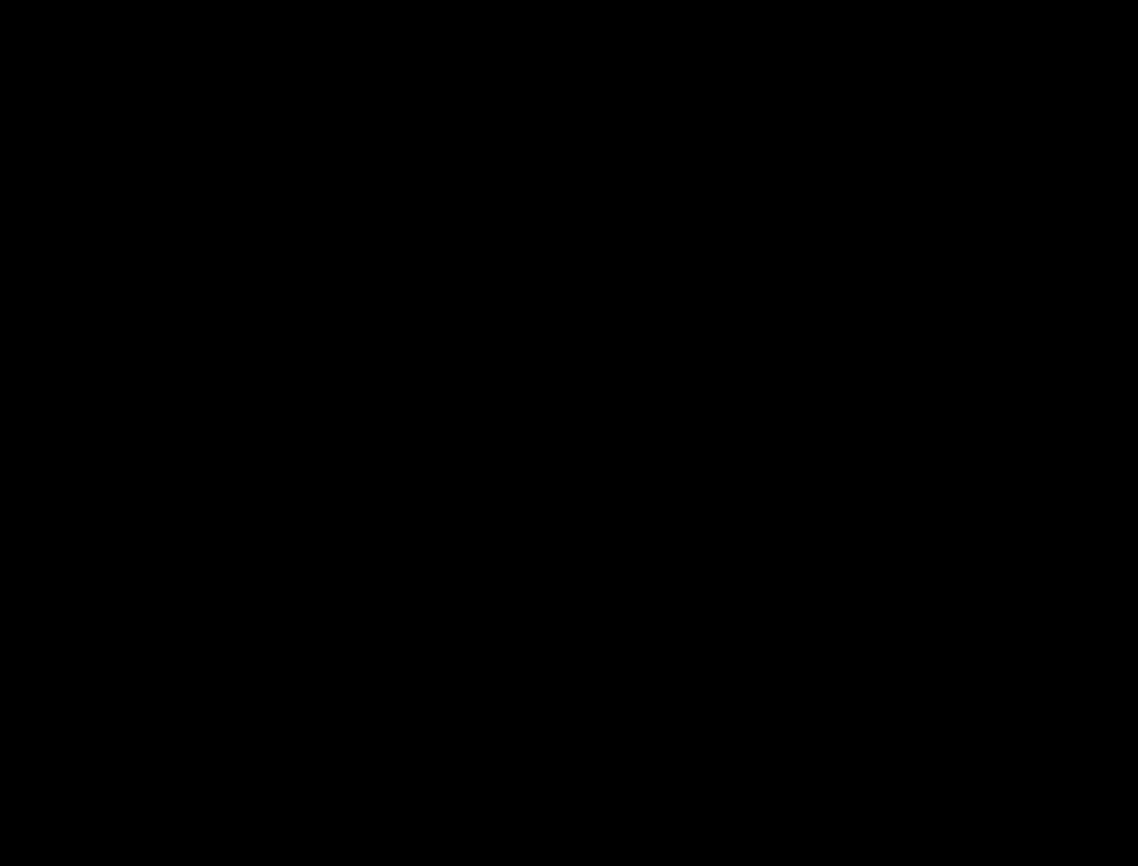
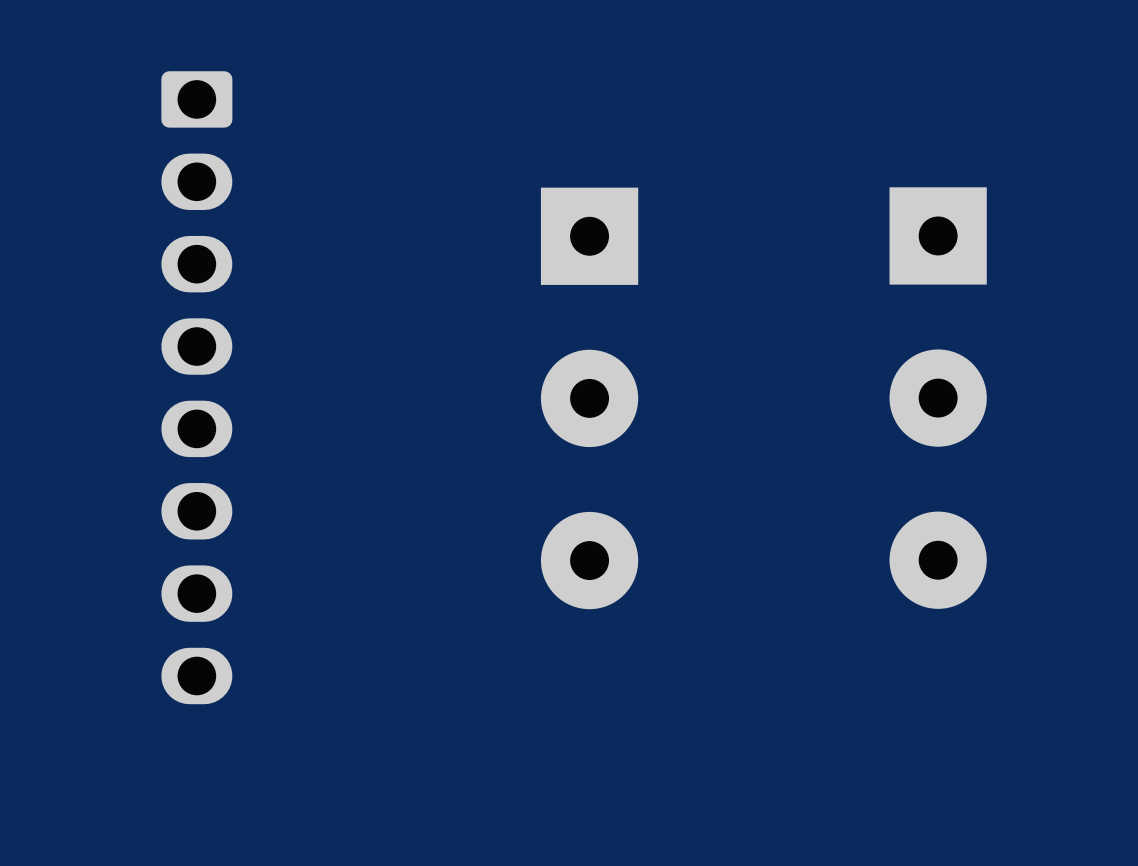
part: none -> (196, 387)
part: none -> (589, 398)
part: none -> (938, 398)

